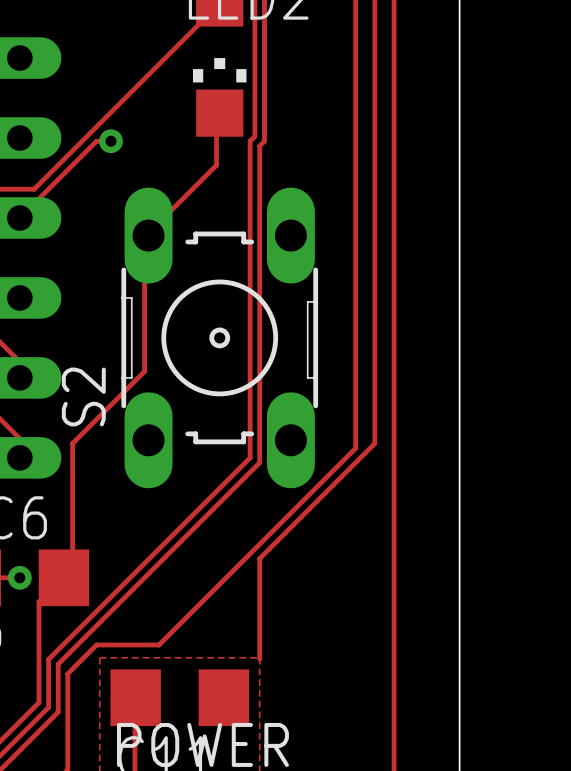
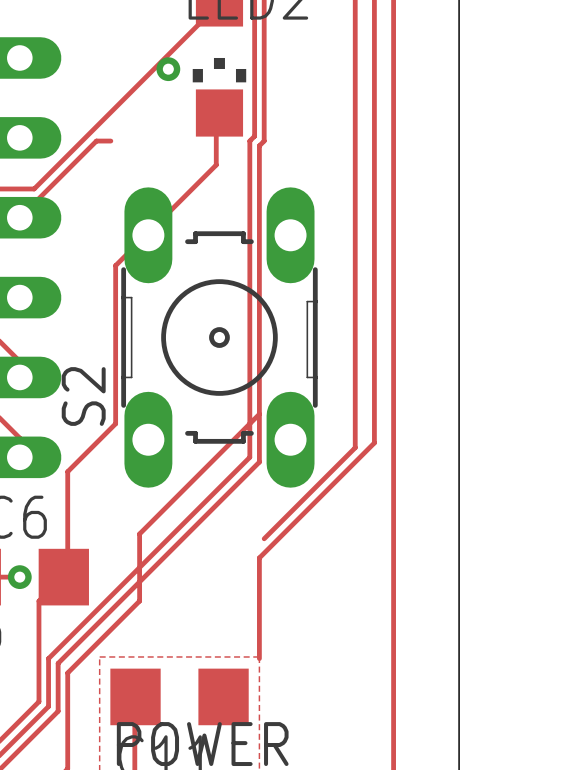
via position: (110, 141) -> (168, 69)
track: (144, 237) (144, 371) (72, 443) (72, 573) (67, 577) -> (144, 236) (115, 265) (115, 423) (67, 471) (67, 577)
track: (264, 539) (158, 644) (96, 644) -> (259, 414) (139, 534) (139, 601) (96, 644)

